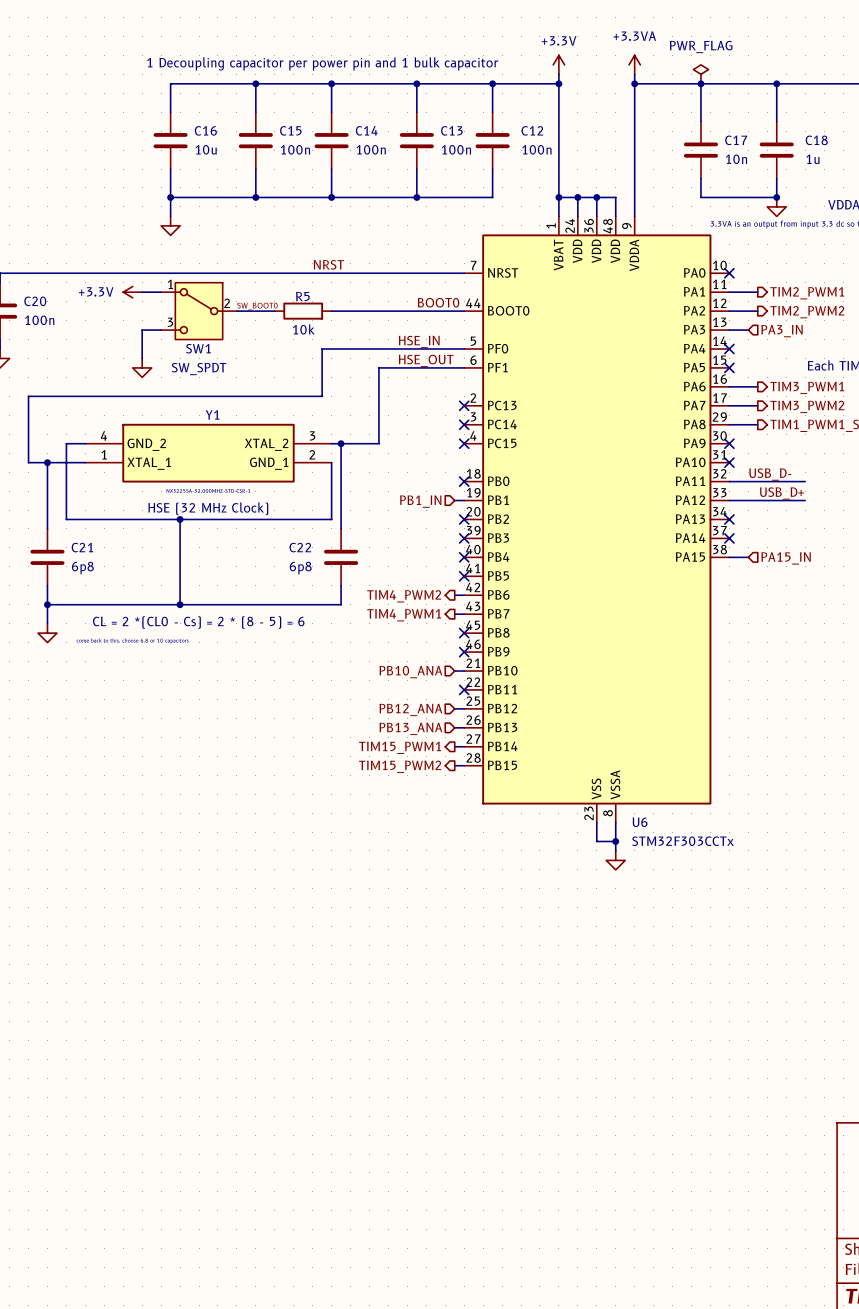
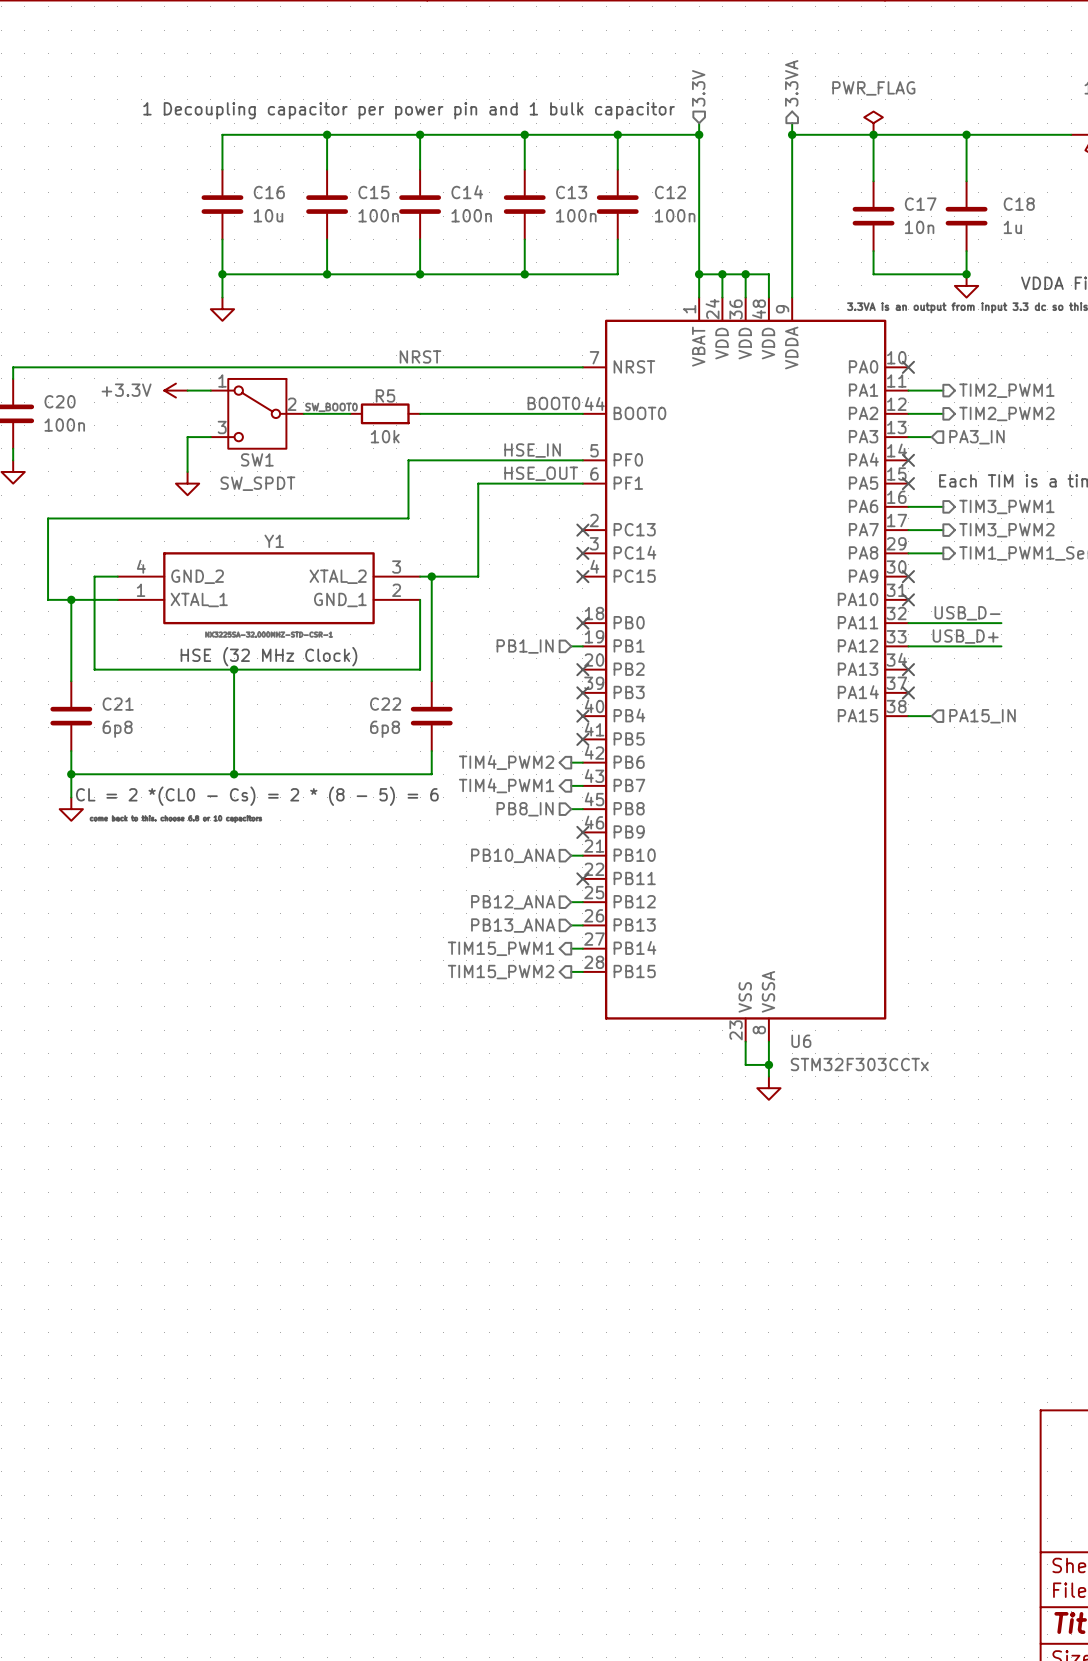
hierarchical label: none -> 3.3VA (791, 83)
hierarchical label: none -> 3.3V (698, 88)
power symbol: +3.3V (558, 64) -> none
power symbol: +3.3VA (634, 64) -> none
wire: none -> (571, 809) (582, 809)
no-connect mark: (464, 633) -> none
hierarchical label: none -> PB8_IN (525, 809)

